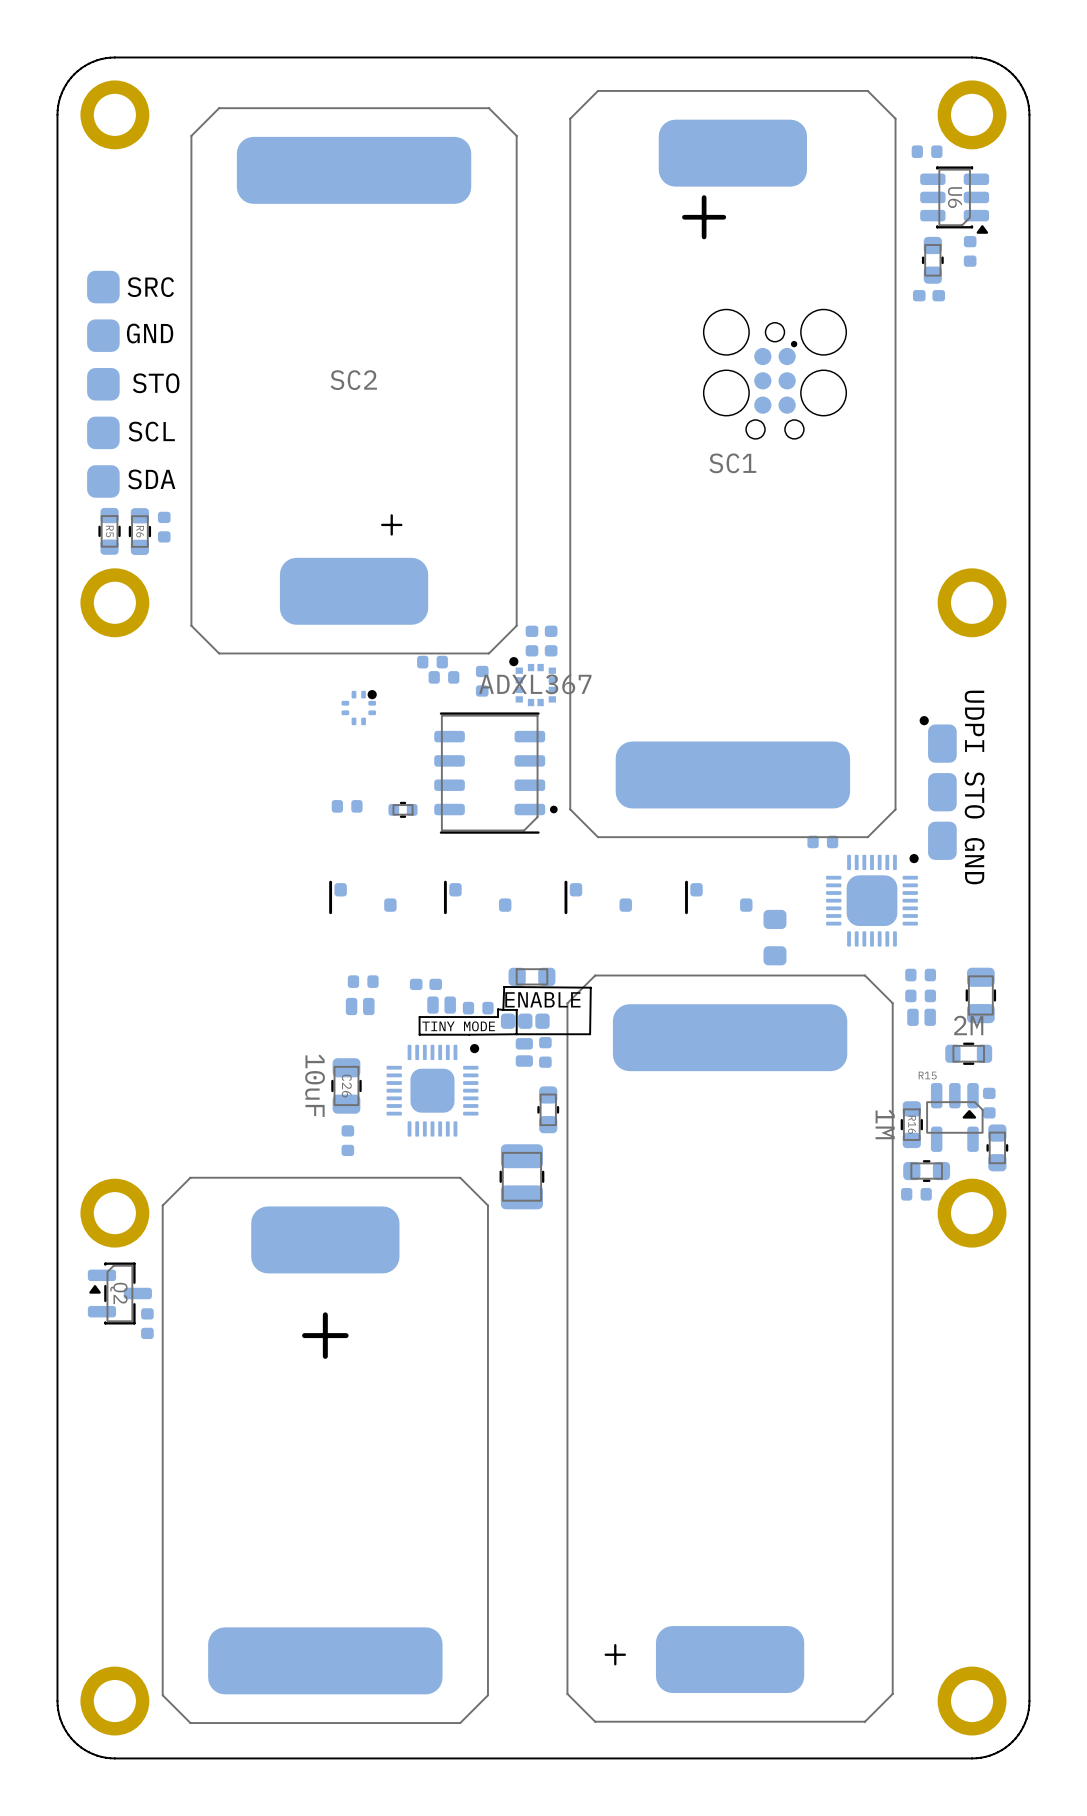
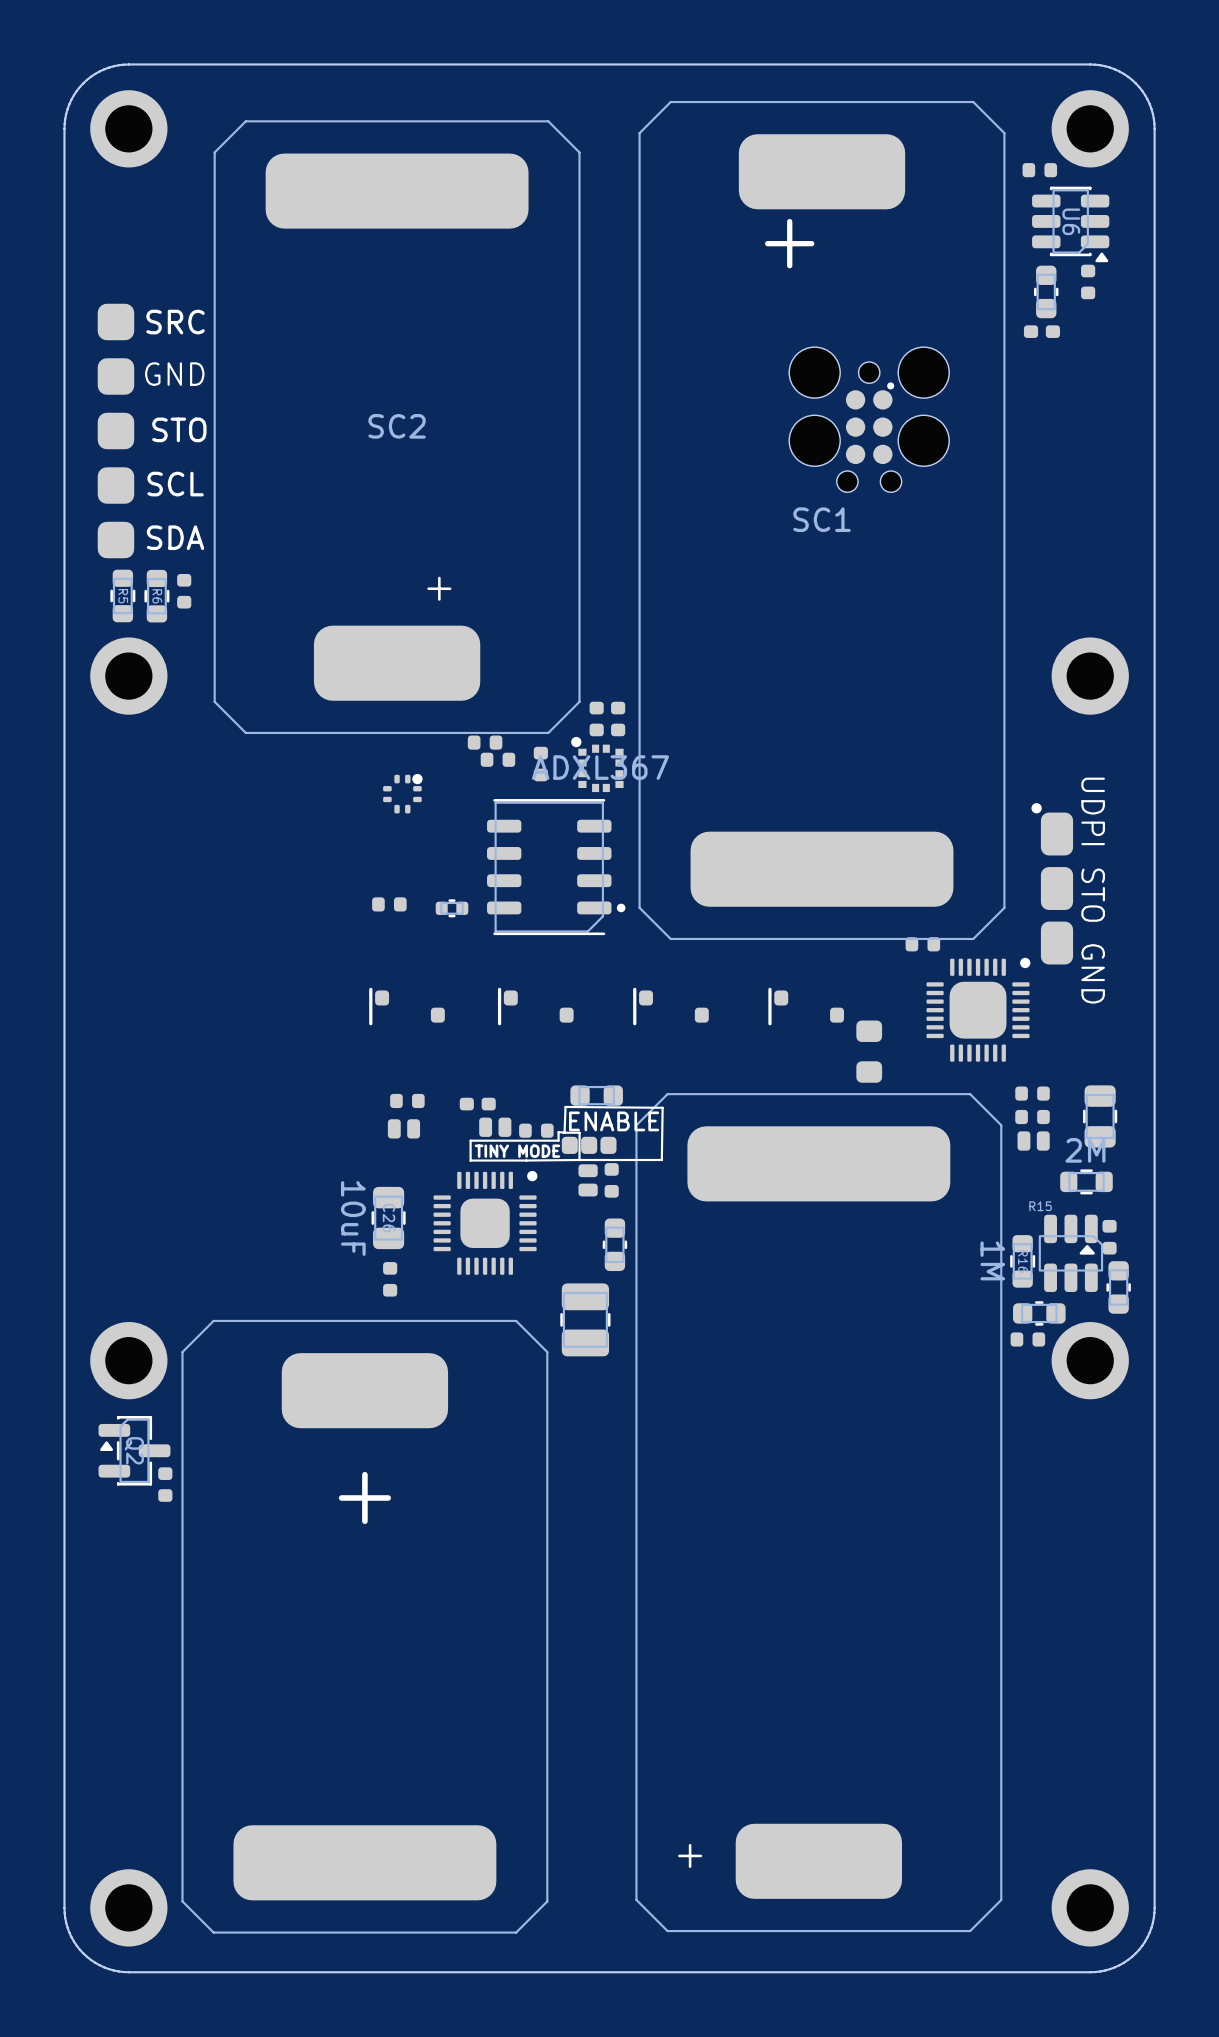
part footprint: [926, 1083, 984, 1152] -> [1038, 1214, 1104, 1292]

